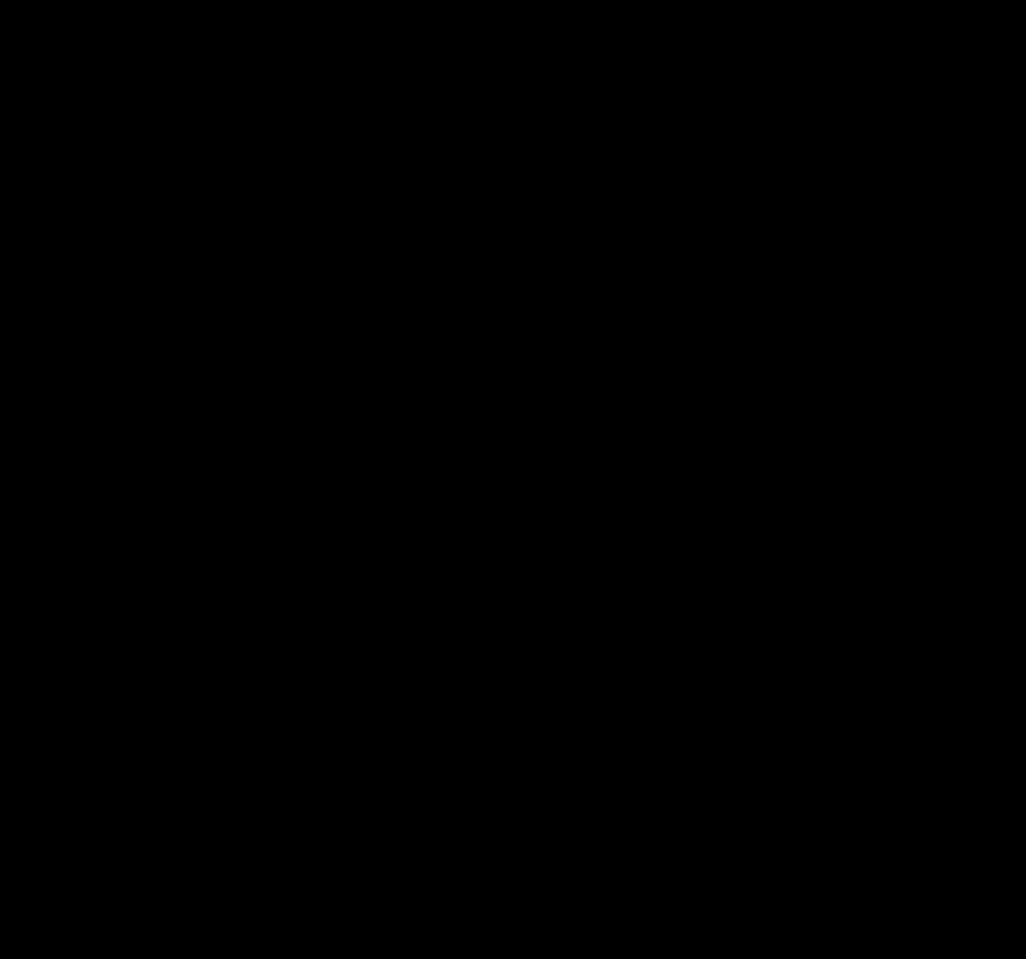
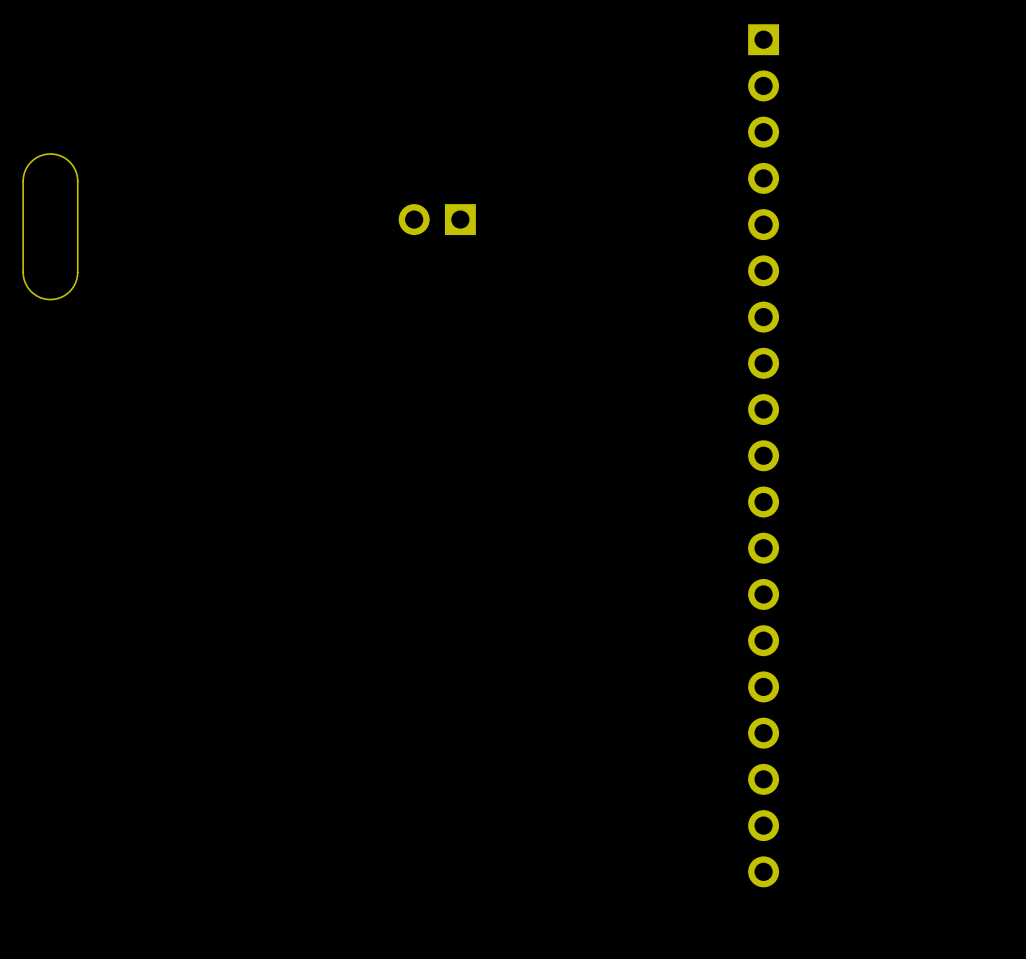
board edge: none -> (77, 181) (76, 279) (72, 288) (64, 295) (54, 299) (43, 298) (28, 288) (23, 275) (24, 174) (33, 159) (43, 154) (54, 154) (64, 157) (72, 164) (77, 181)
part: none -> (437, 219)
part: none -> (763, 455)

